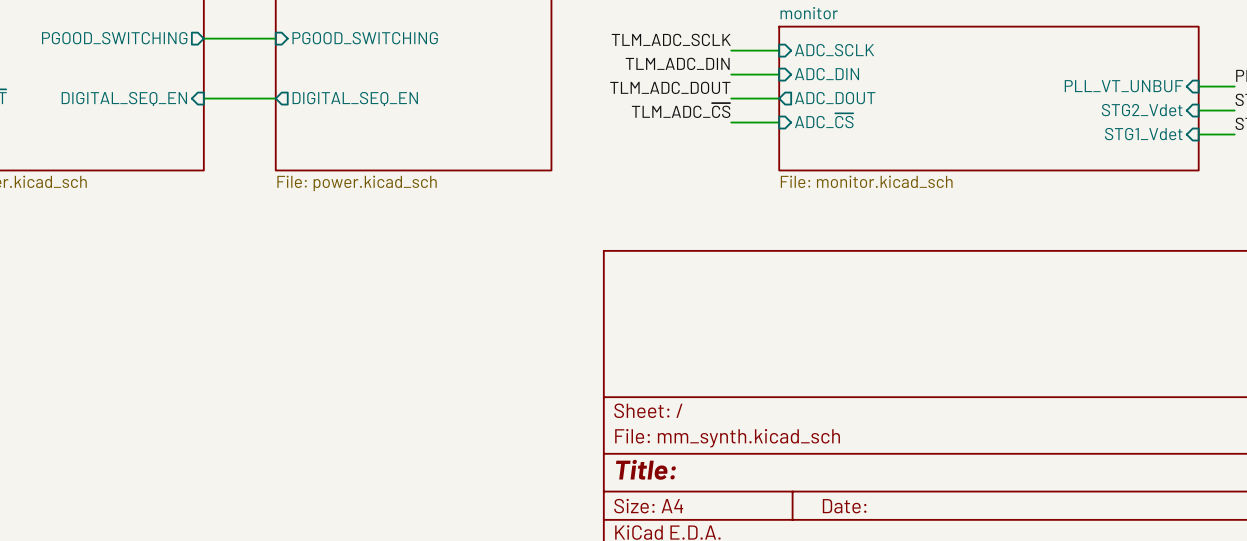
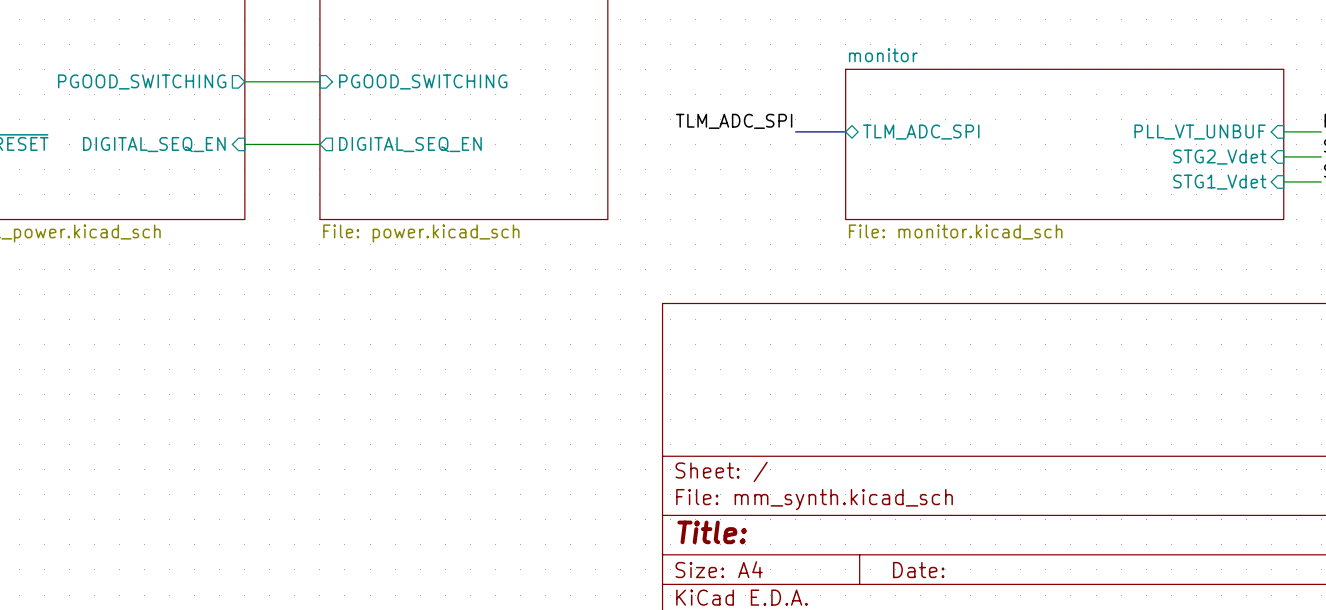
label: TLM_ADC_SCLK (671, 39) -> none
wire: (731, 50) (779, 50) -> none
sheet pin: ADC_SCLK (834, 50) -> none
label: TLM_ADC_DIN (677, 63) -> none
wire: (731, 74) (779, 74) -> none
sheet pin: ADC_DIN (827, 74) -> none
label: none -> TLM_ADC_SPI (734, 121)
bus: none -> (795, 131) (845, 131)
sheet pin: none -> TLM_ADC_SPI (921, 132)
label: TLM_ADC_DOUT (670, 87) -> none
wire: (731, 98) (779, 98) -> none
sheet pin: ADC_DOUT (835, 98) -> none
label: TLM_ADC_~{CS} (681, 110) -> none
sheet pin: ADC_~{CS} (824, 120) -> none
wire: (731, 122) (779, 122) -> none

